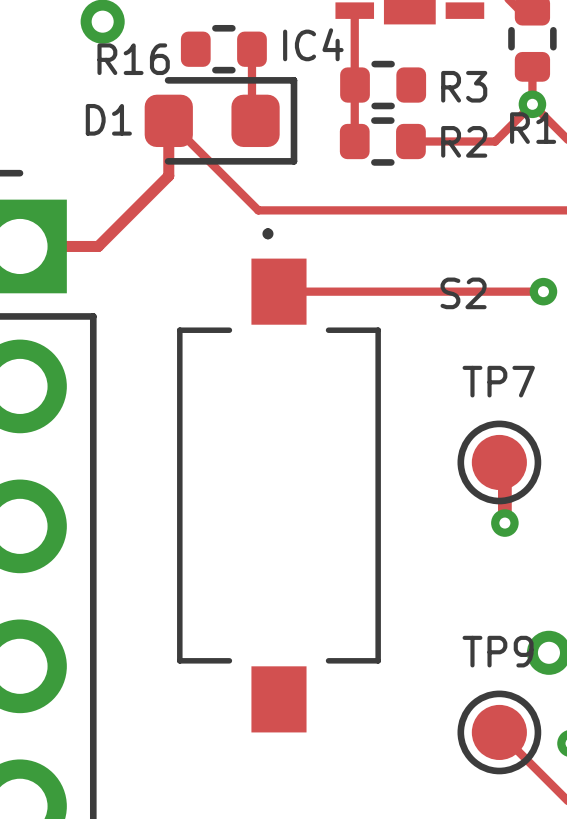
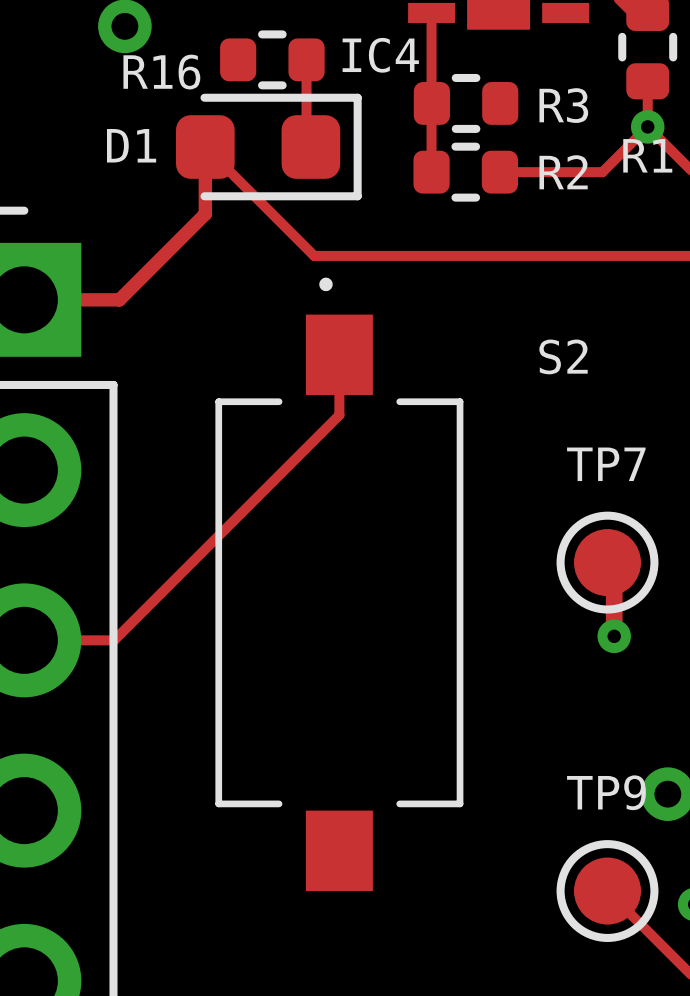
track: (278, 291) (543, 291) -> (339, 354) (339, 415) (114, 640) (24, 640)
via: (543, 291) -> none

